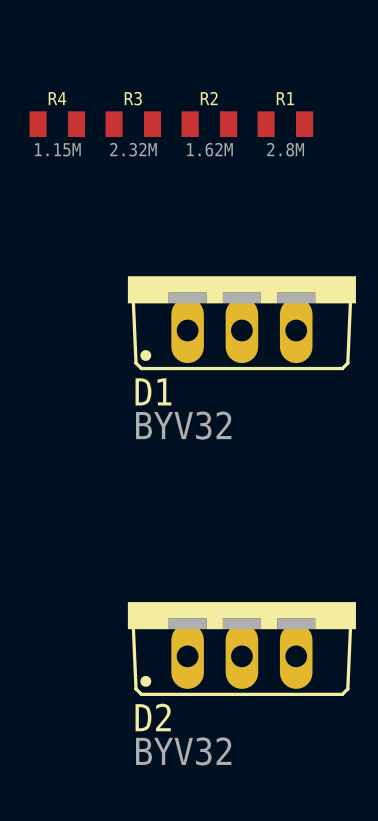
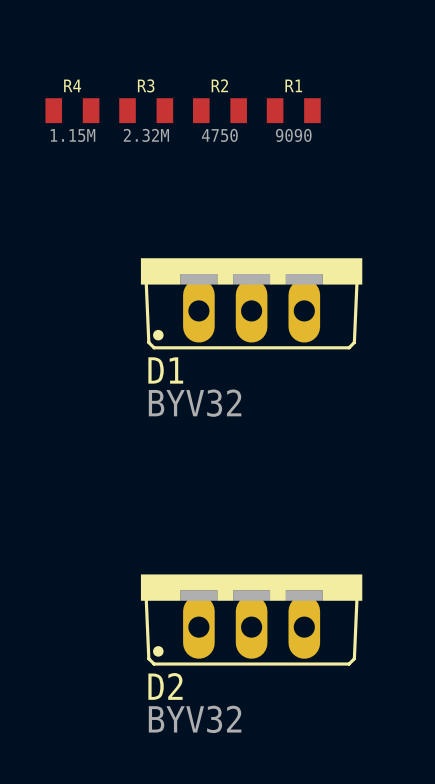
R2 value: 1.62M (209, 149) -> 4750 (219, 135)
R1 value: 2.8M (285, 149) -> 9090 (293, 135)

